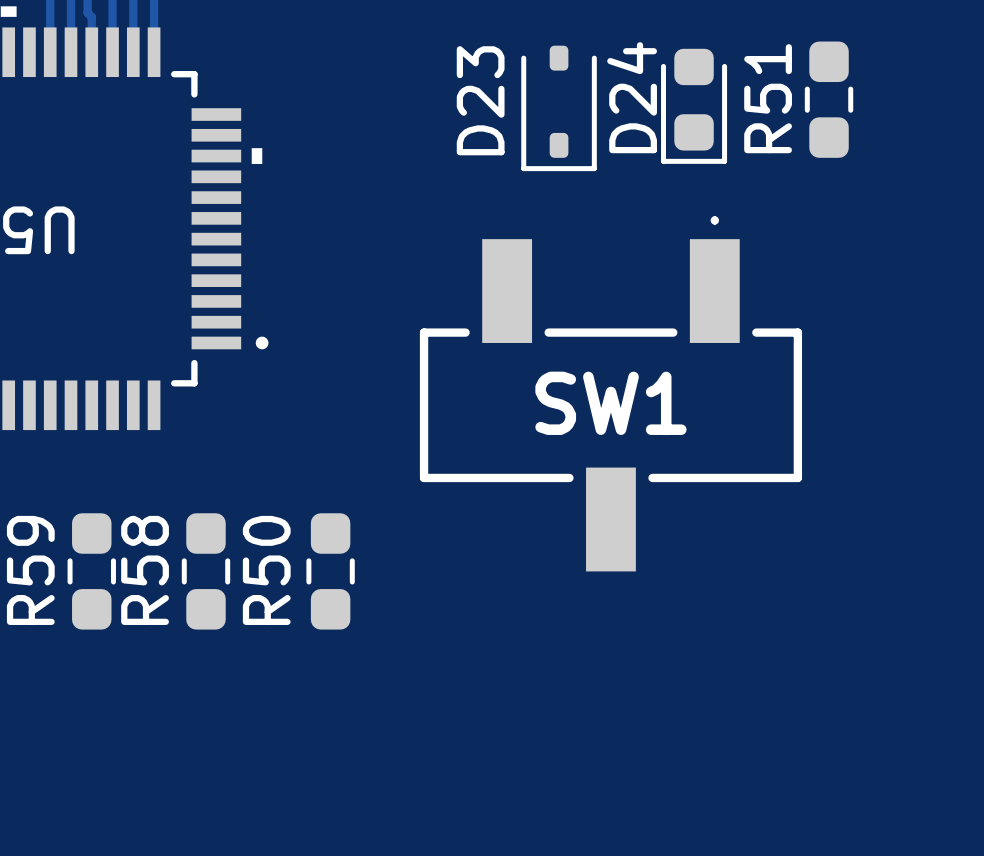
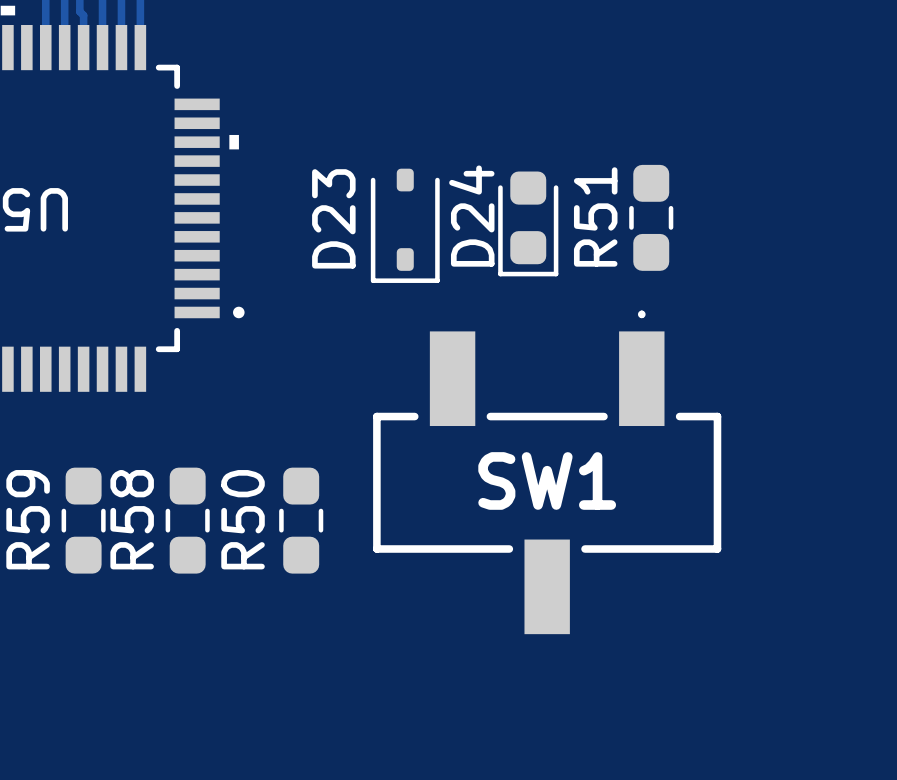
R51 position: (829, 99) -> (651, 217)
D24 position: (694, 106) -> (528, 223)
D23 position: (559, 108) -> (405, 225)
SW1 position: (610, 393) -> (547, 472)

